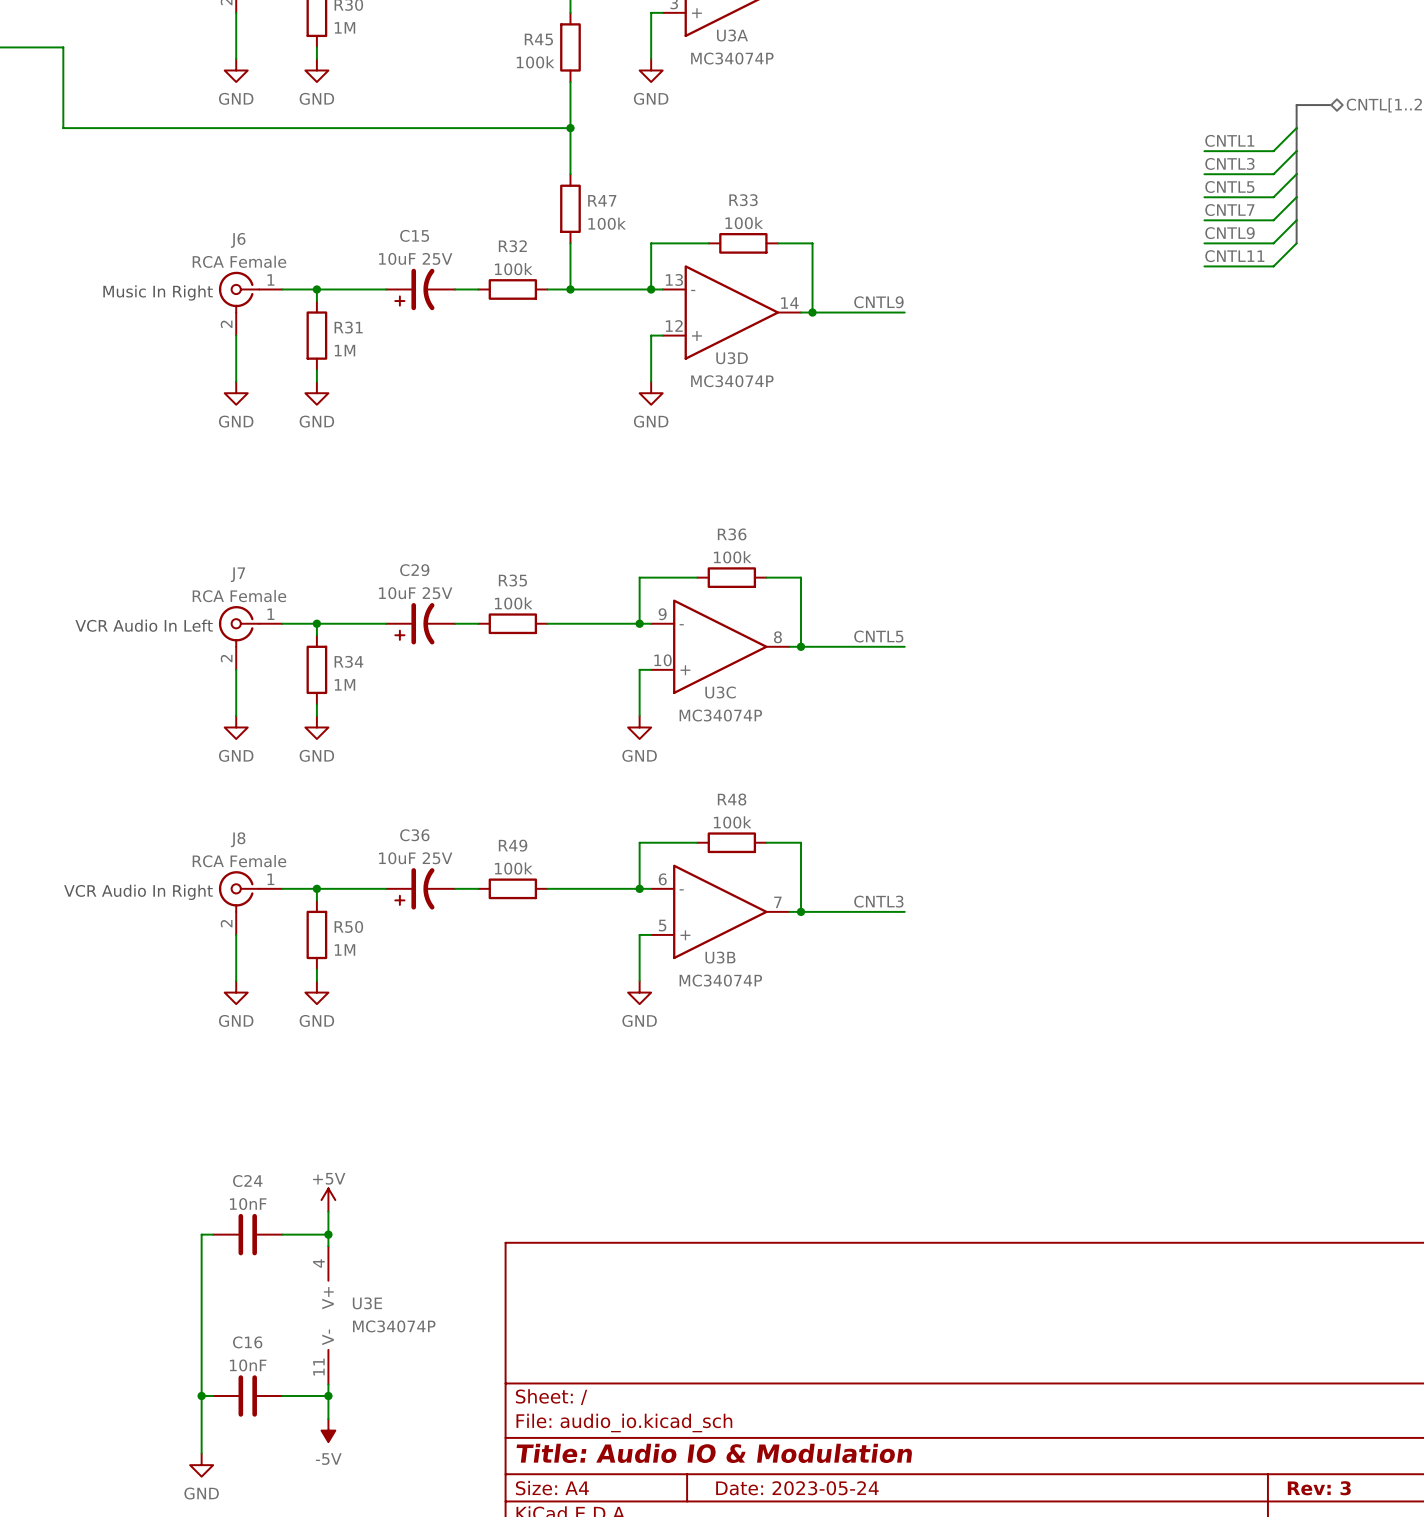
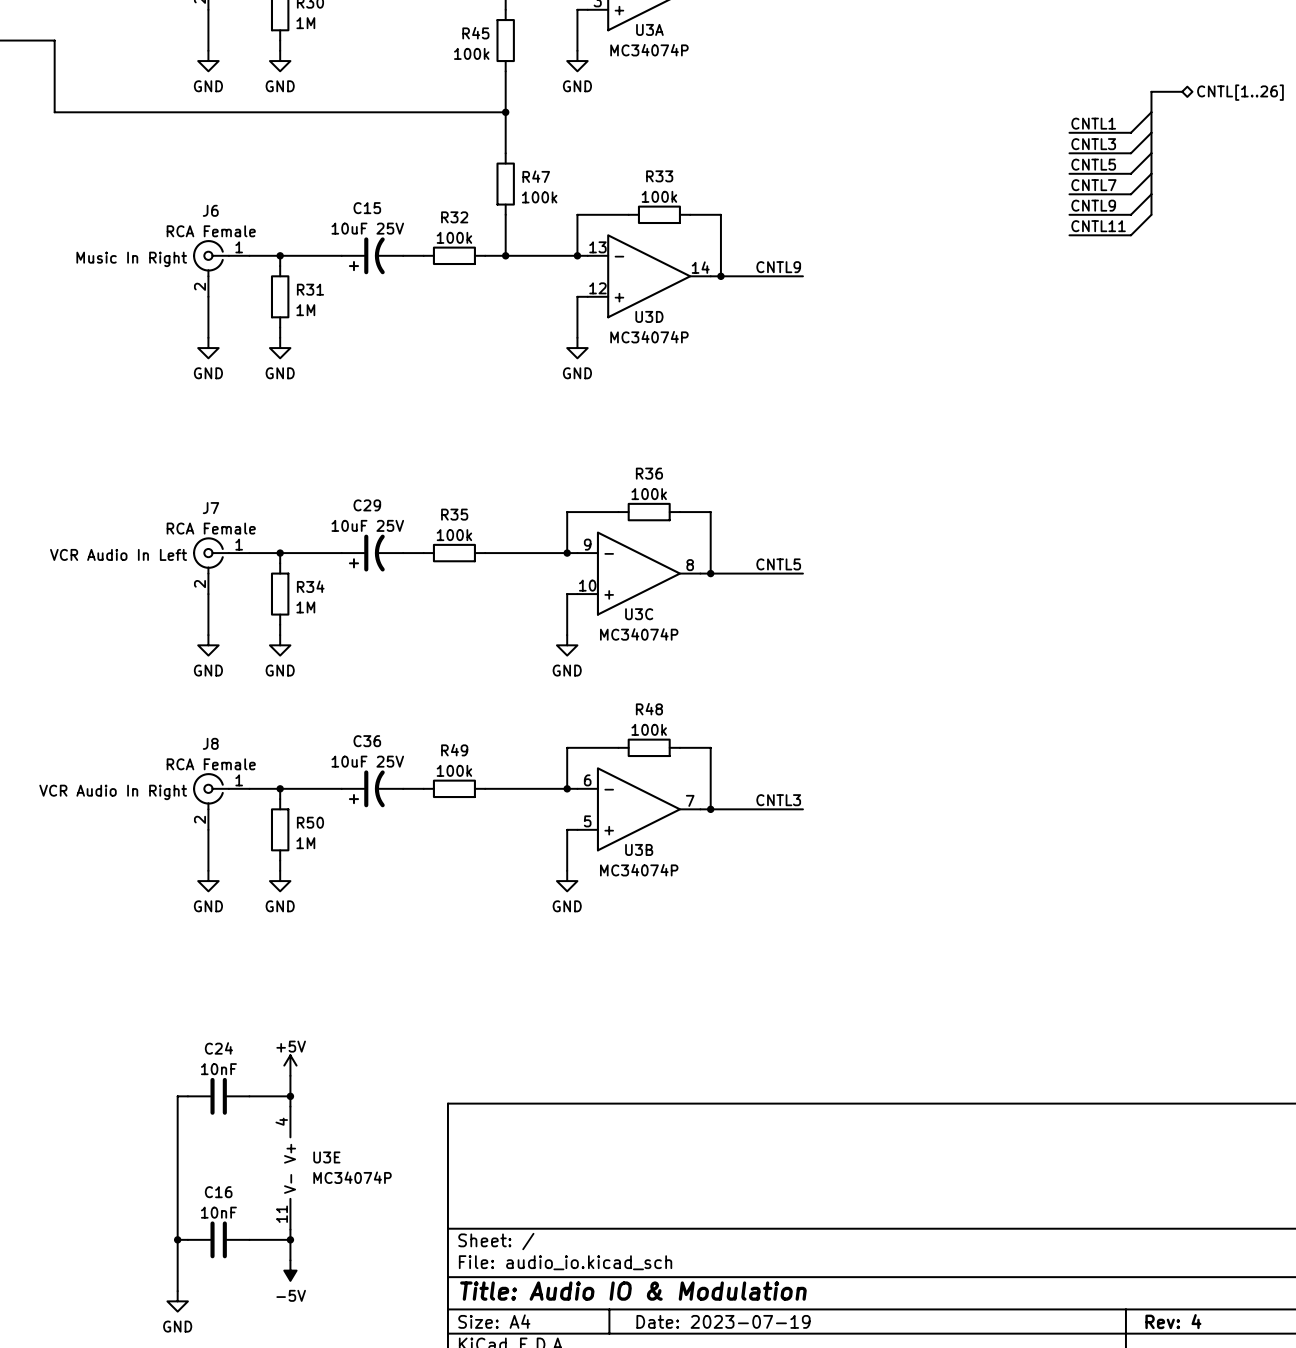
title block: Date: 2023-05-24 (797, 1488) -> Date: 2023-07-19 (723, 1321)
title block: Rev: 3 (1319, 1488) -> Rev: 4 (1173, 1321)

